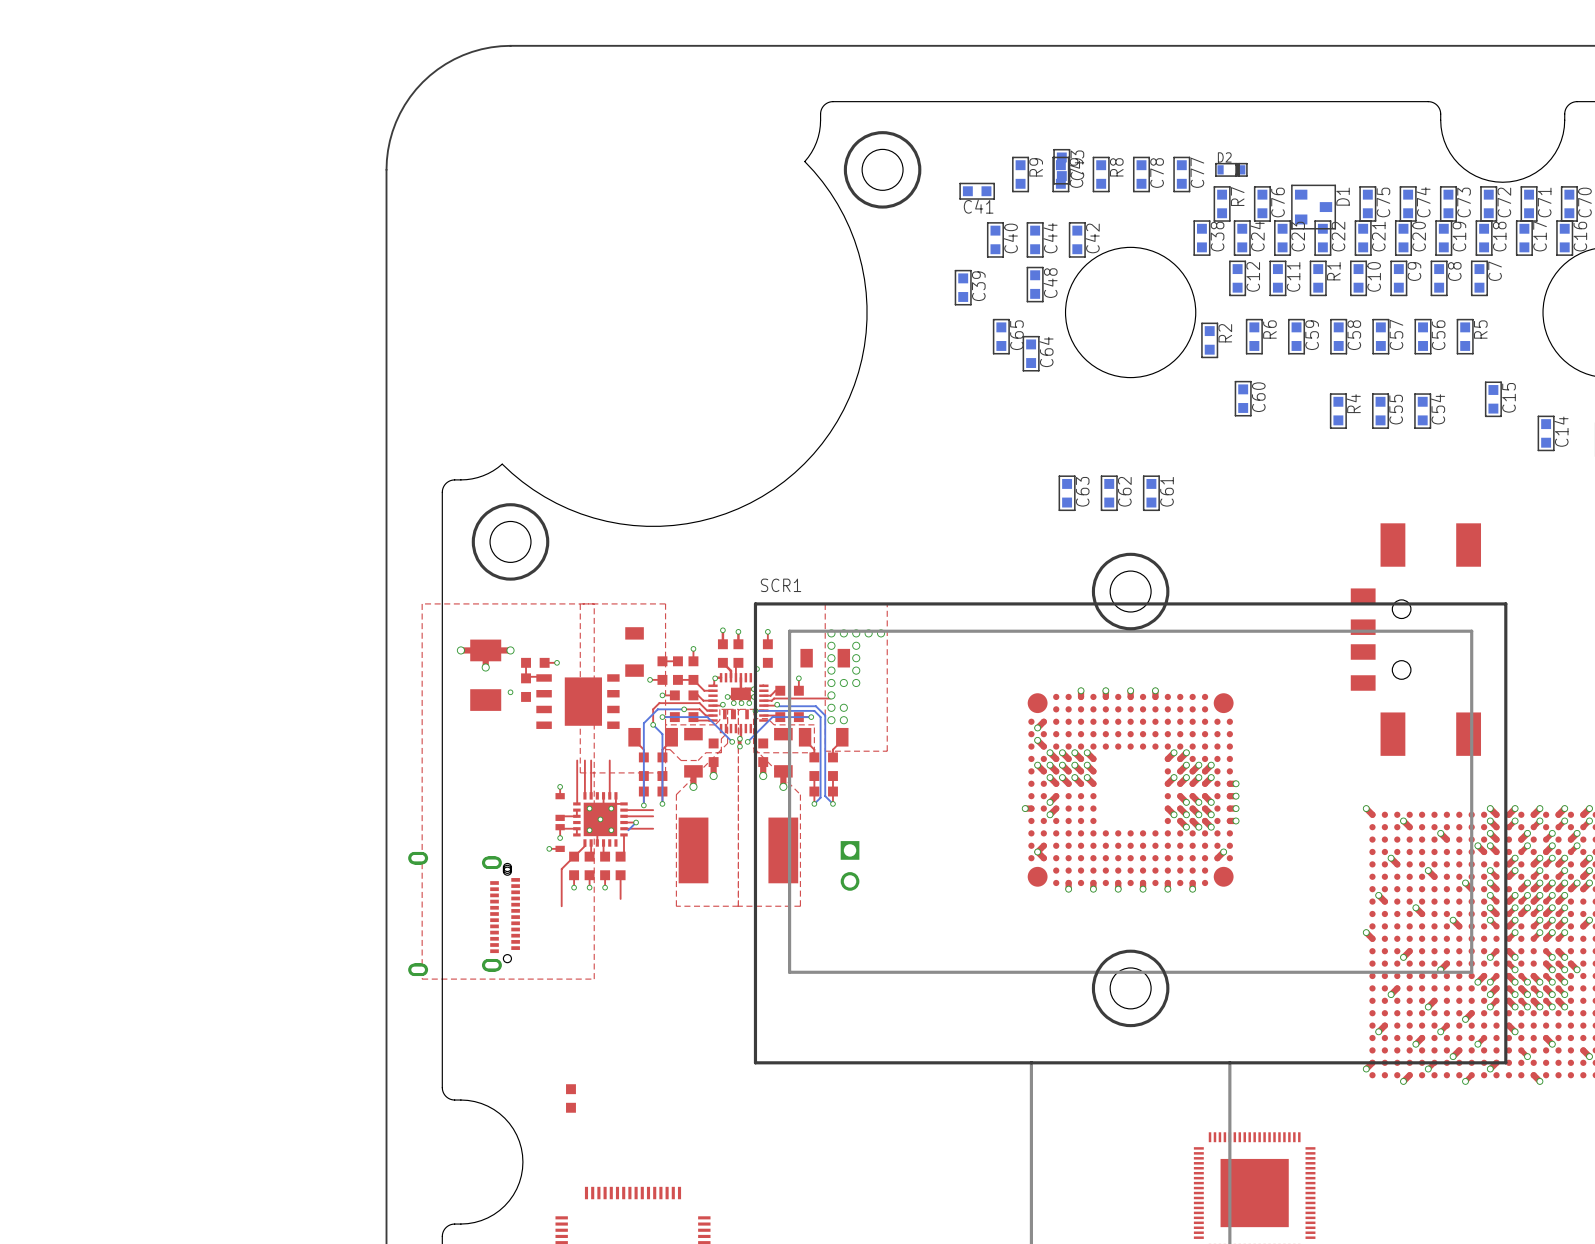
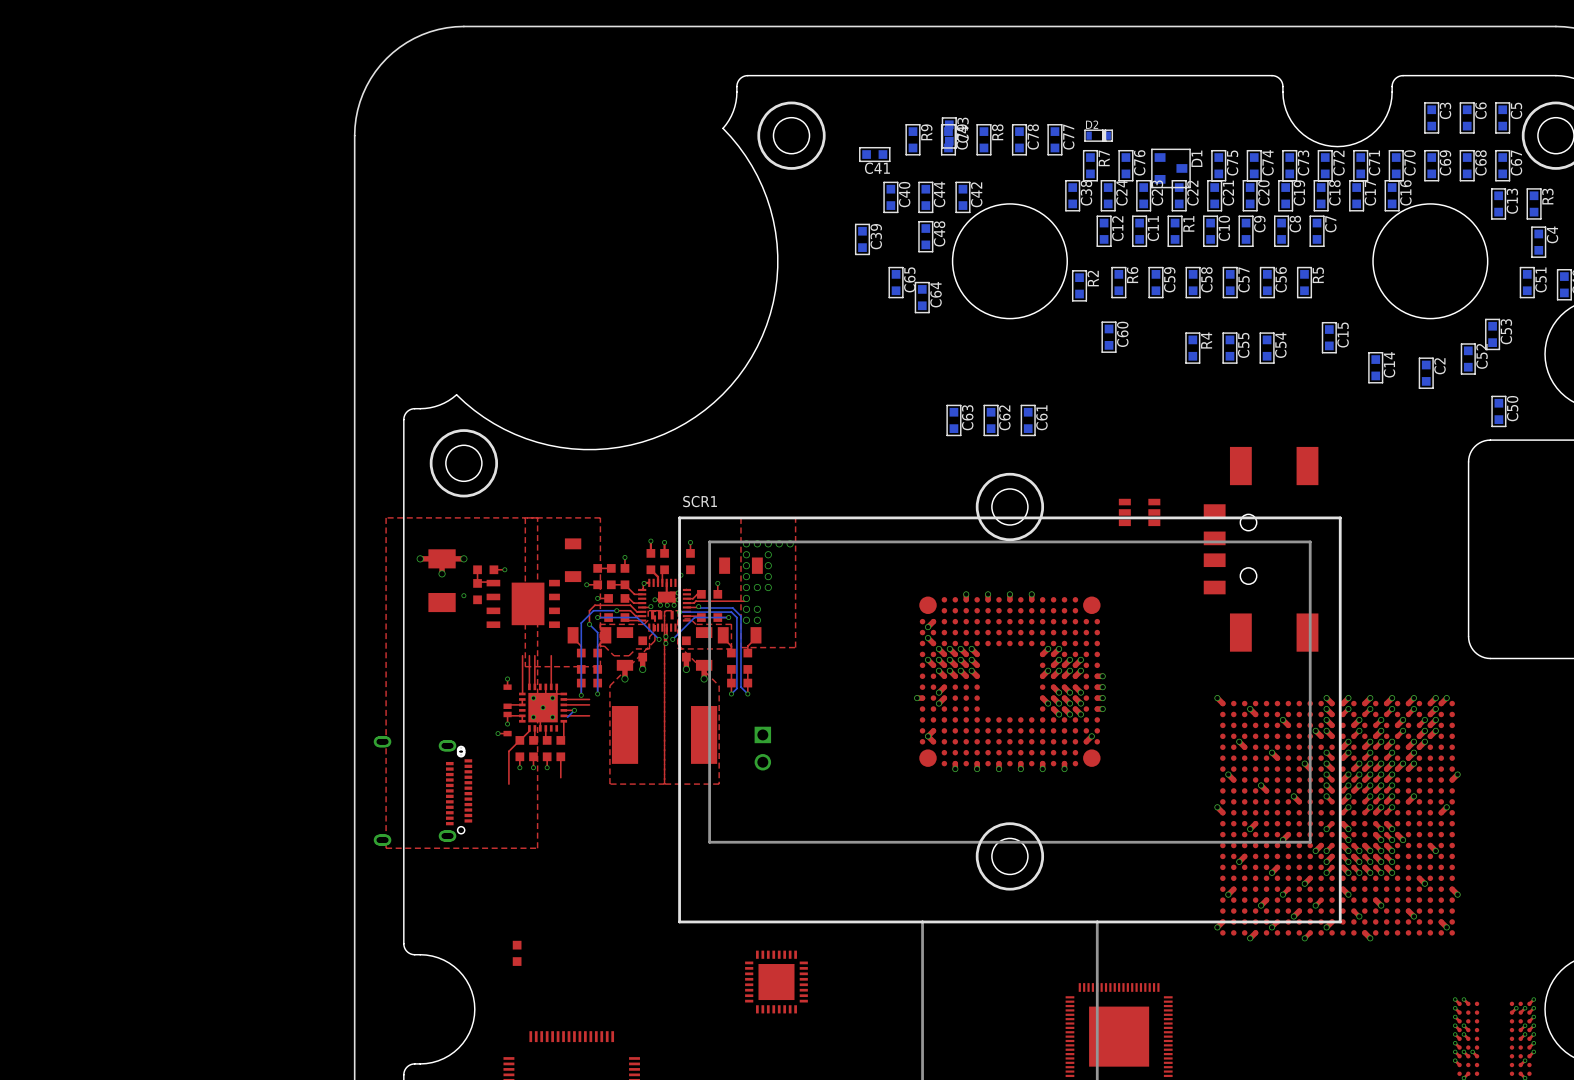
part: none -> (1139, 512)
part: none -> (776, 982)

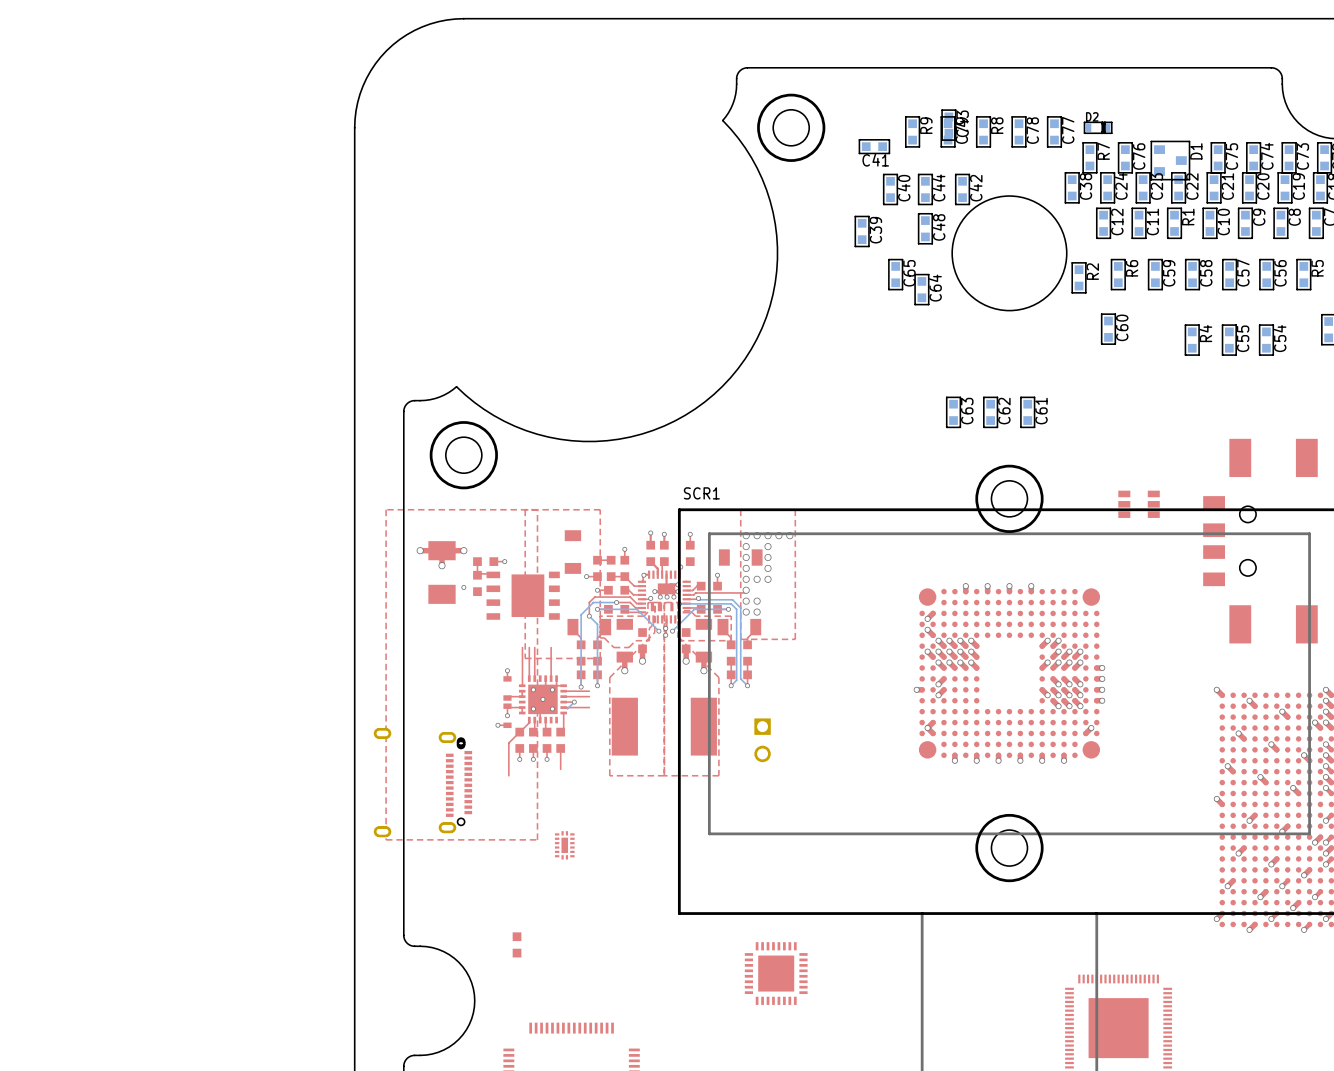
part: none -> (564, 845)

